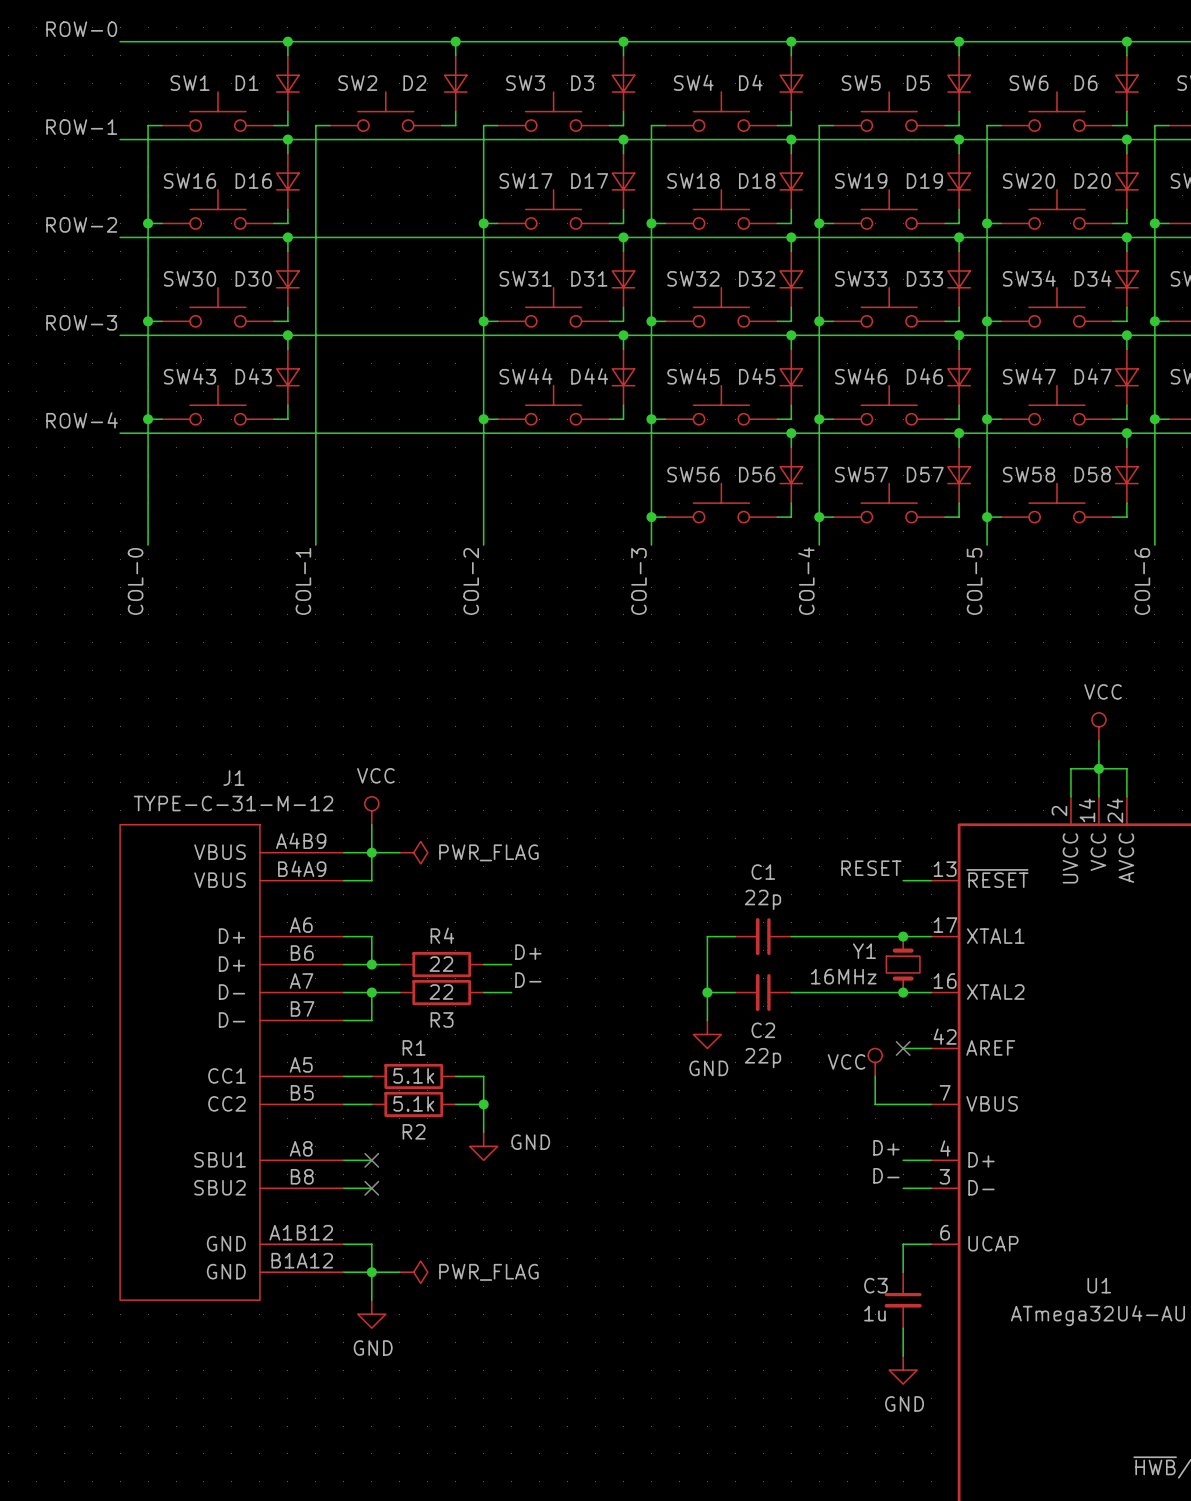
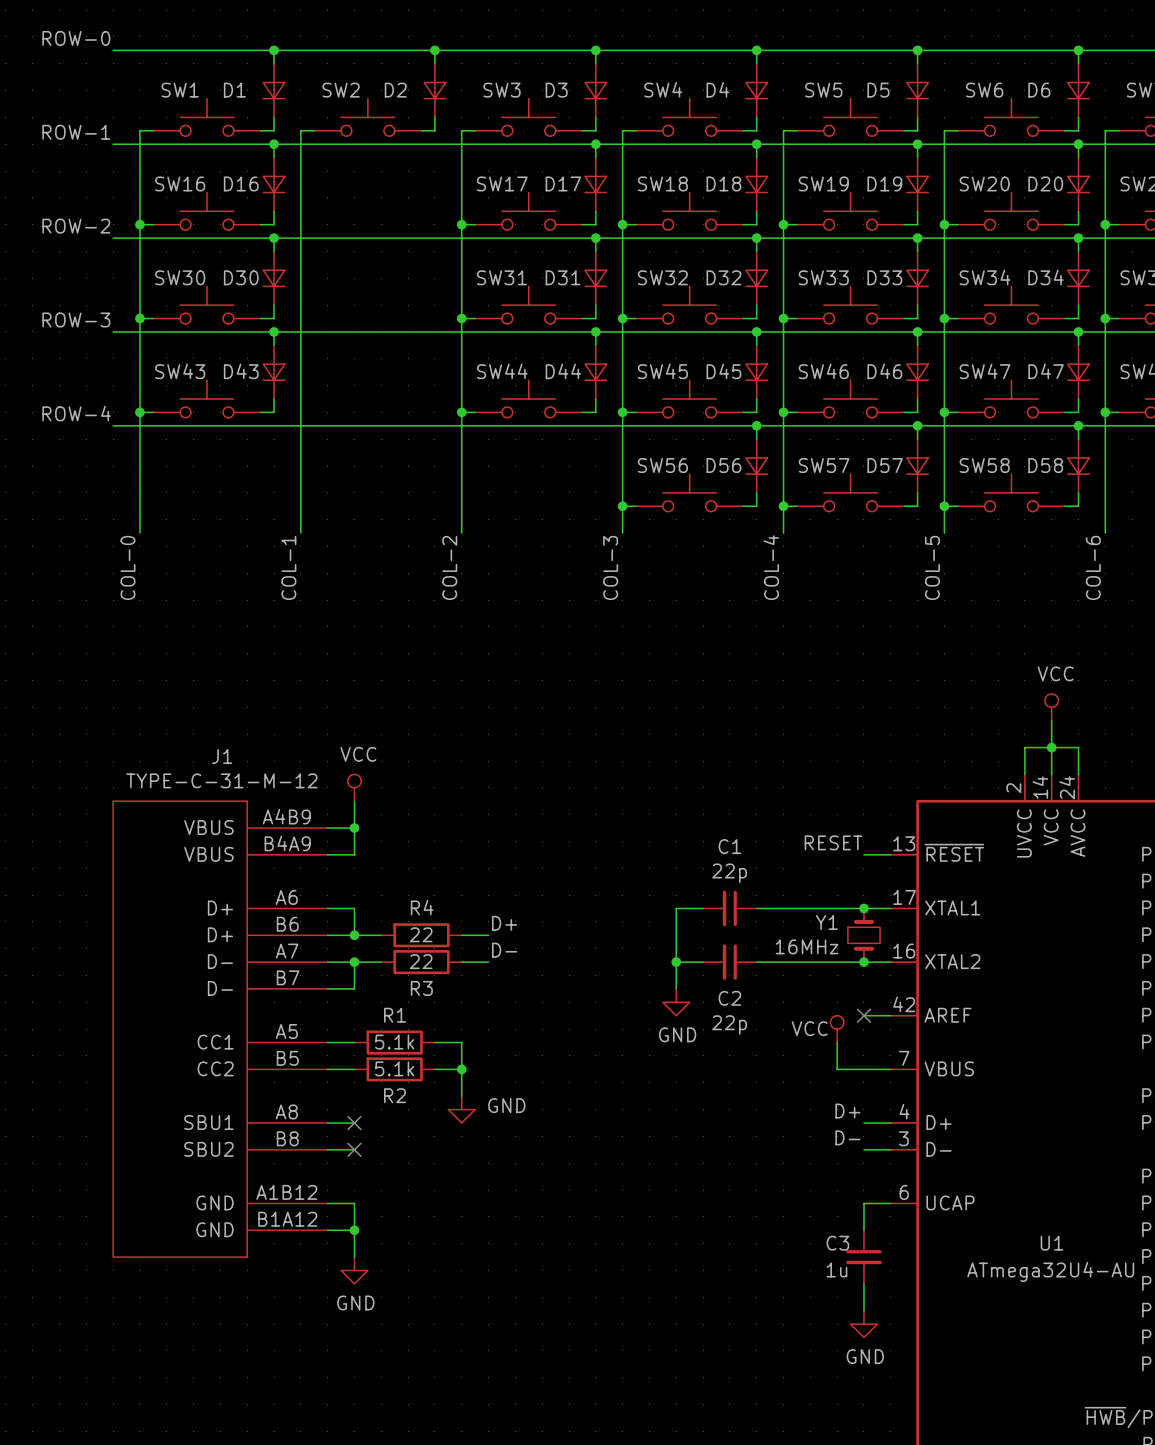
wire: (371, 852) (399, 852) -> none
power symbol: PWR_FLAG (413, 852) -> none
wire: (371, 1272) (399, 1272) -> none
power symbol: PWR_FLAG (413, 1272) -> none

